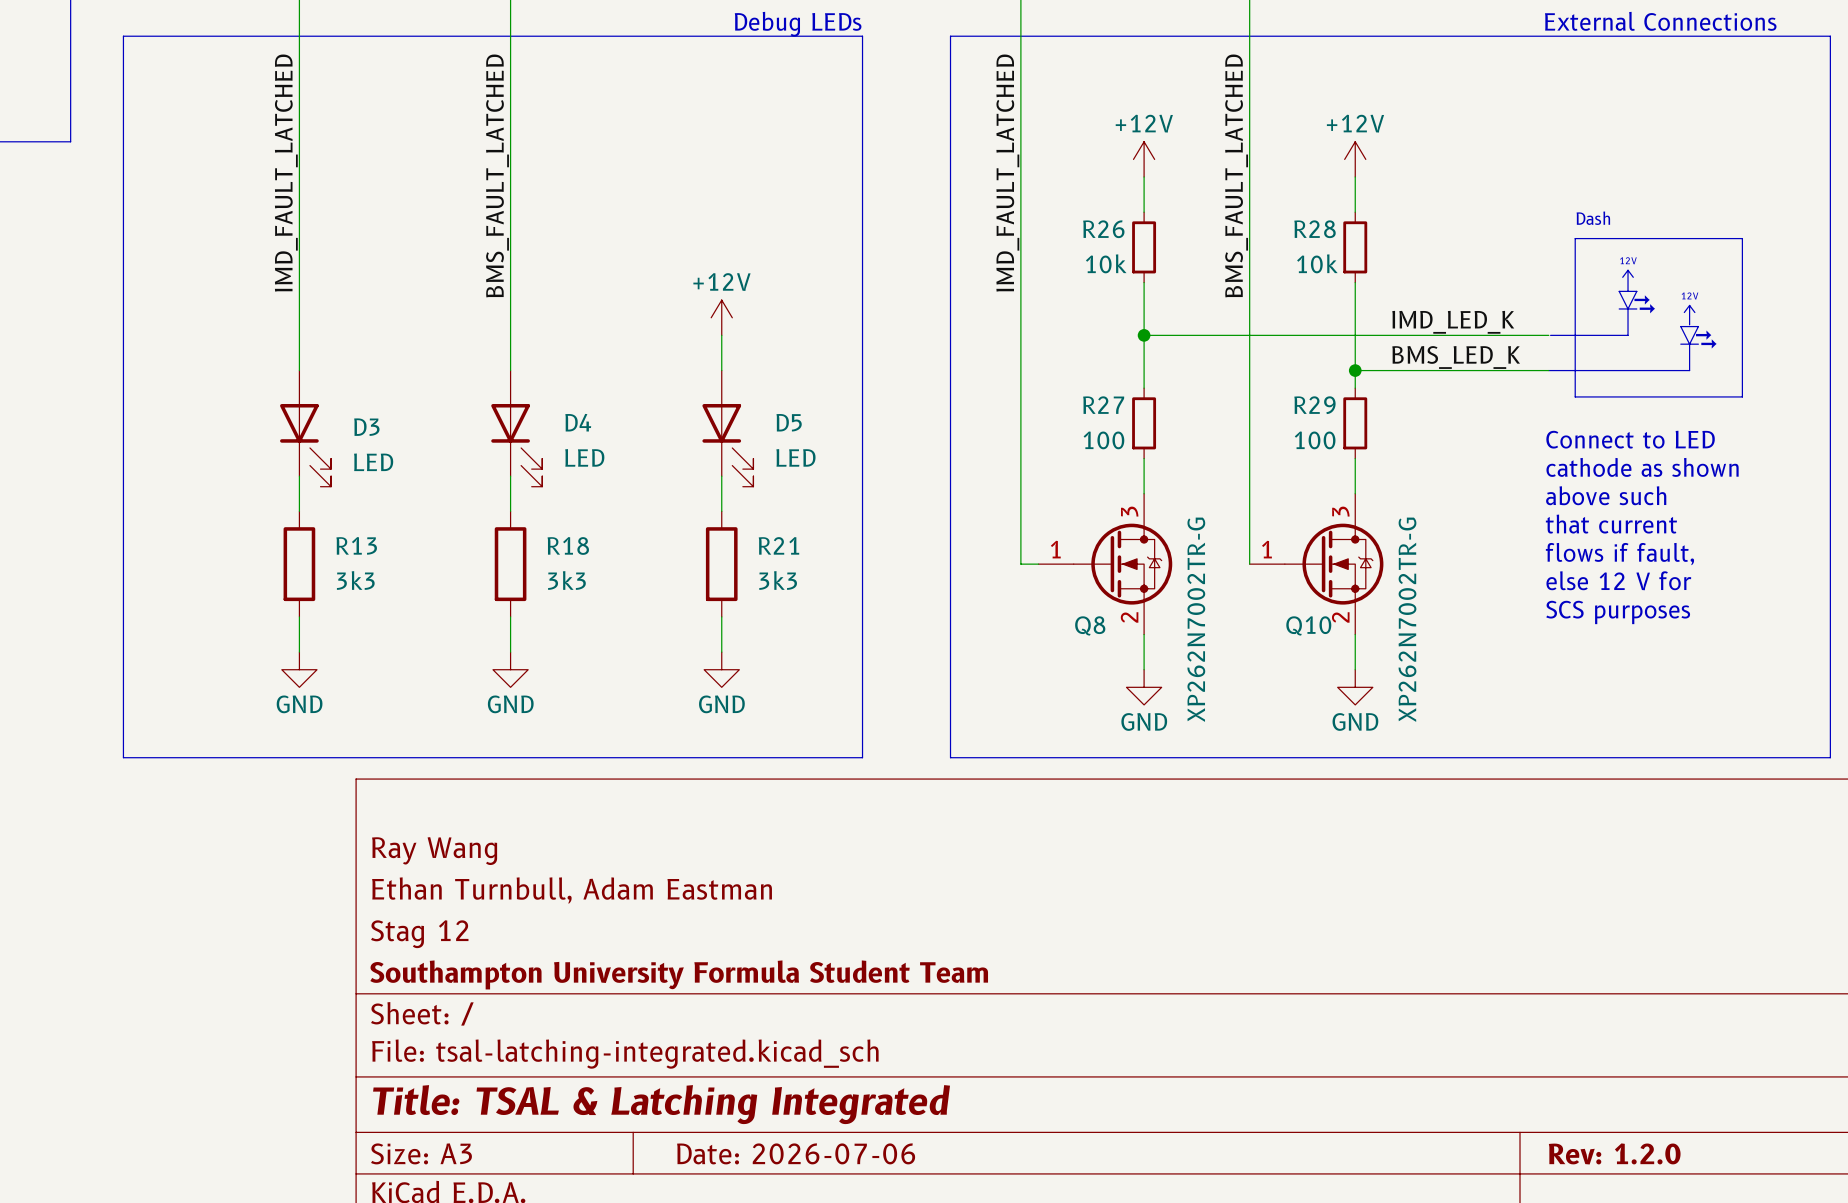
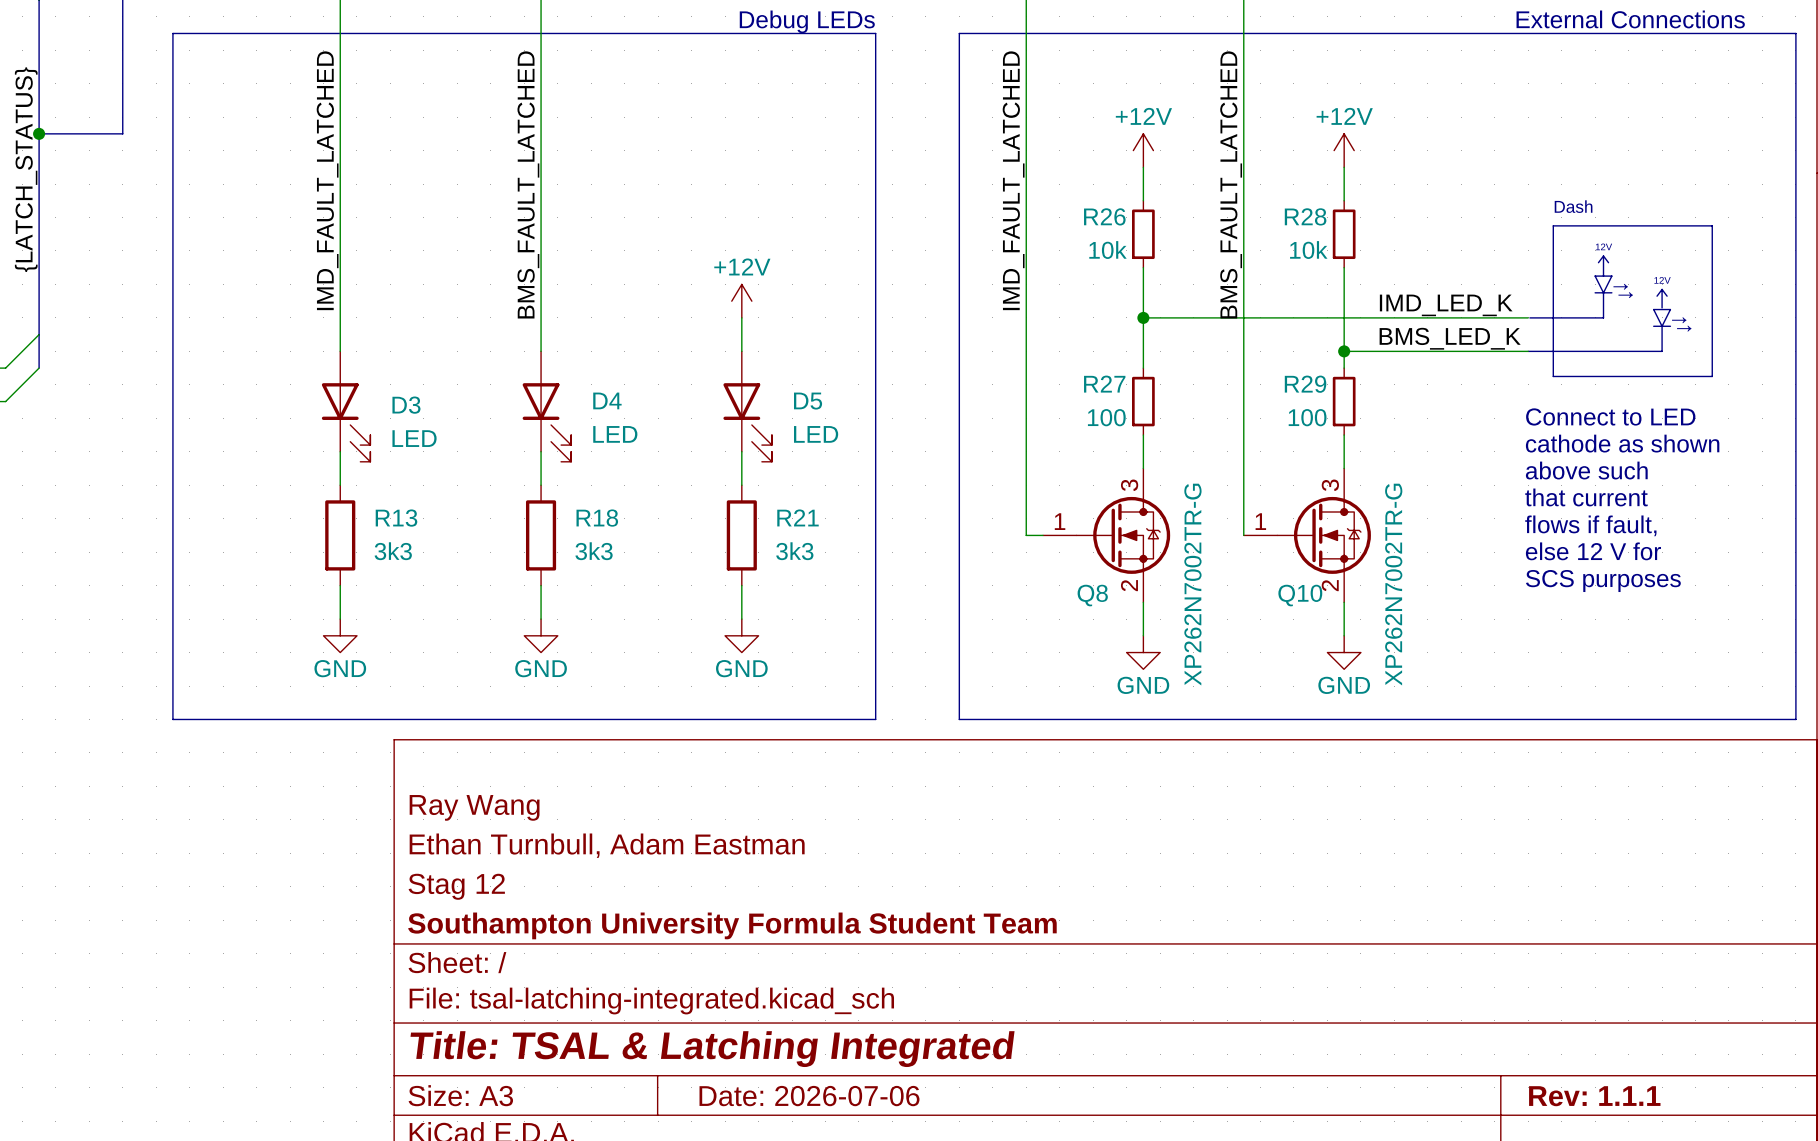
title block: Rev: 1.2.0 (1614, 1153) -> Rev: 1.1.1 (1594, 1096)

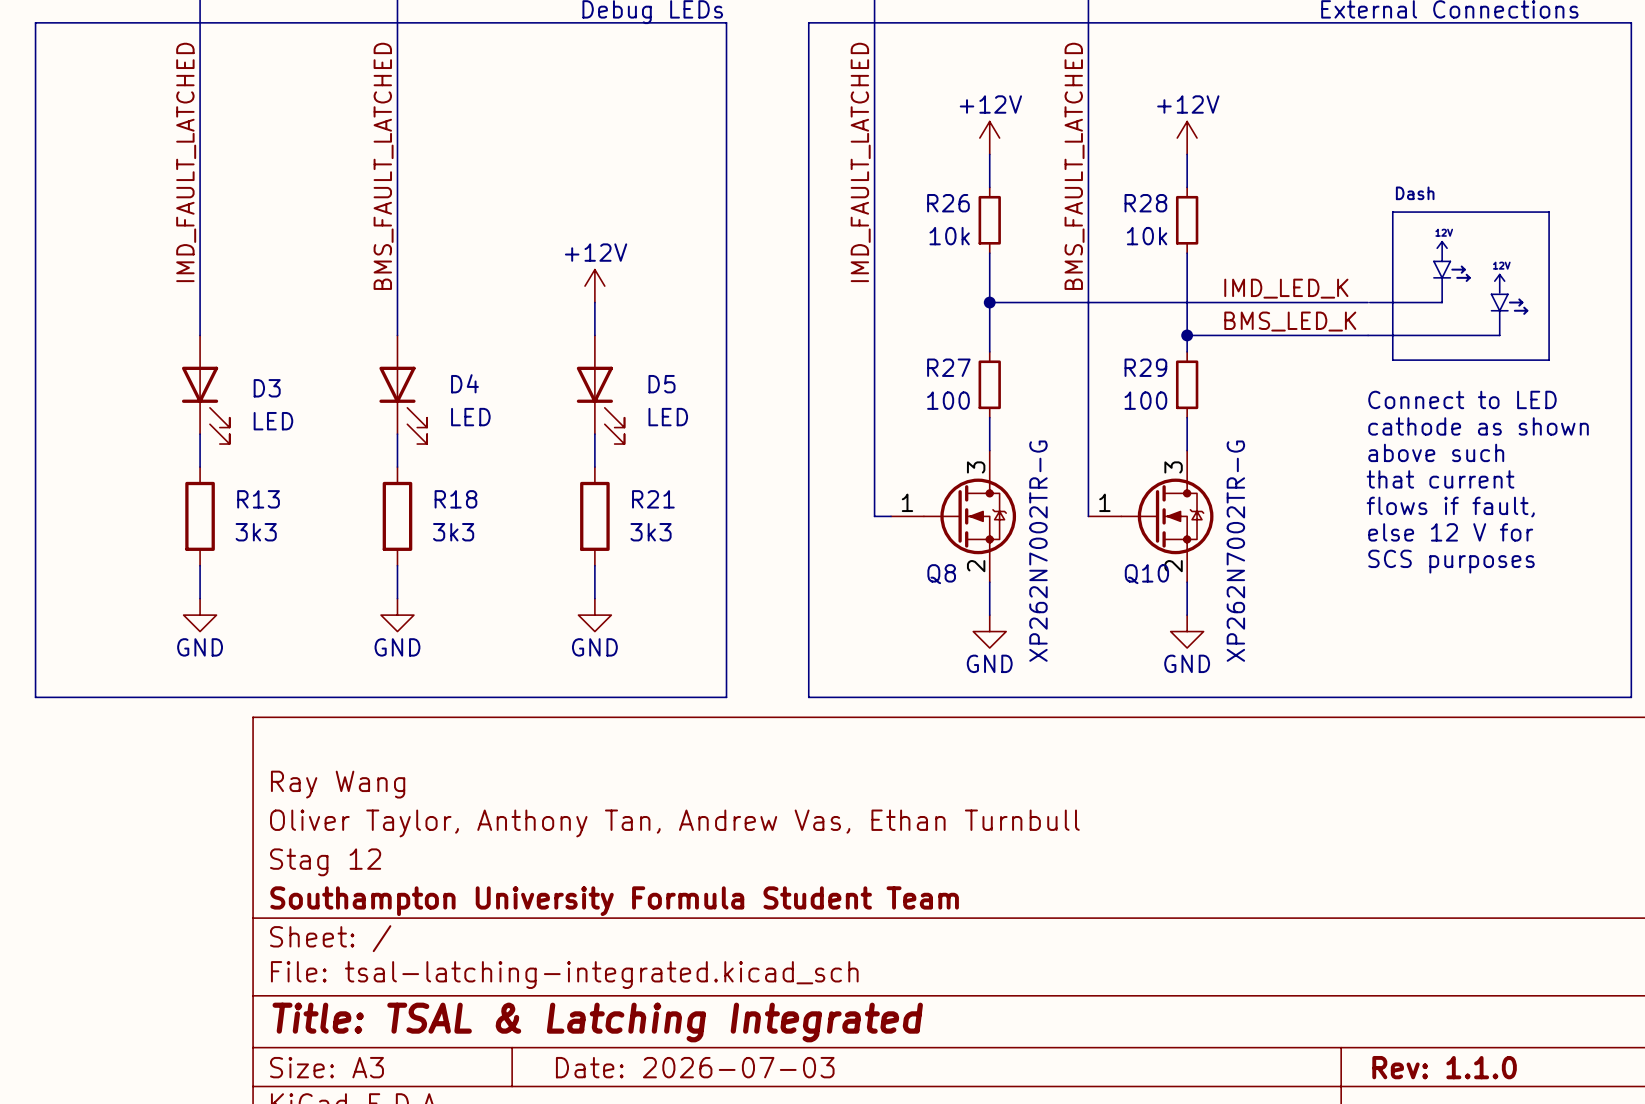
title block: Ethan Turnbull, Adam Eastman (607, 845) -> Oliver Taylor, Anthony Tan, Andrew Vas, Ethan Turnbull (674, 823)
title block: Date: 2026-07-06 (809, 1096) -> Date: 2026-07-03 (695, 1067)
title block: Rev: 1.1.1 (1594, 1096) -> Rev: 1.1.0 (1444, 1067)

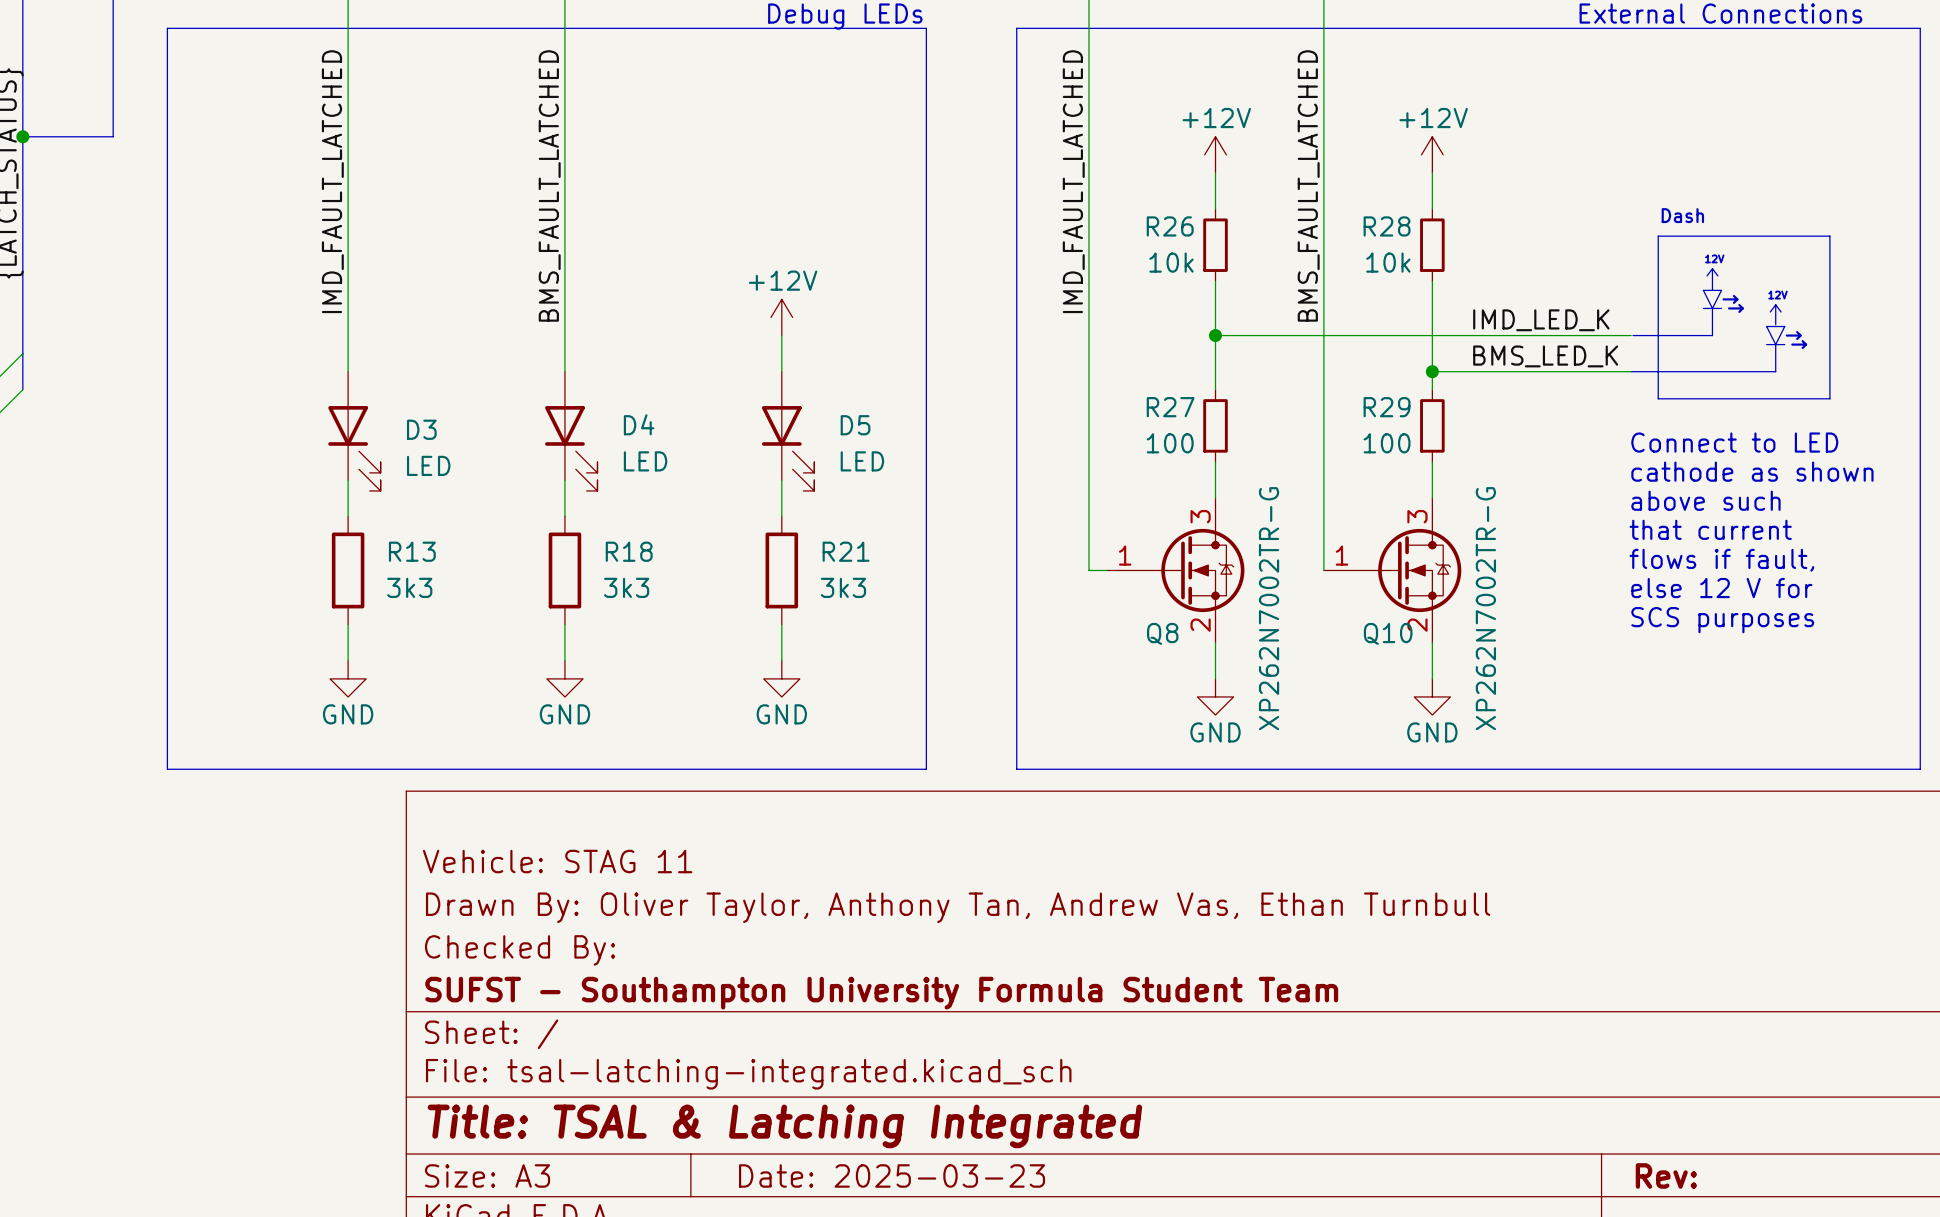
title block: Ray Wang (338, 784) -> Vehicle: STAG 11 (557, 861)
title block: Oliver Taylor, Anthony Tan, Andrew Vas, Ethan Turnbull (674, 823) -> Drawn By: Oliver Taylor, Anthony Tan, Andrew Vas, Ethan Turnbull (958, 907)
title block: Stag 12 (325, 862) -> Checked By: (520, 950)
title block: Southampton University Formula Student Team (614, 901) -> SUFST - Southampton University Formula Student Team (881, 993)
title block: Date: 2026-07-03 (695, 1067) -> Date: 2025-03-23 (892, 1175)
title block: Rev: 1.1.0 (1444, 1067) -> Rev: (1666, 1175)

